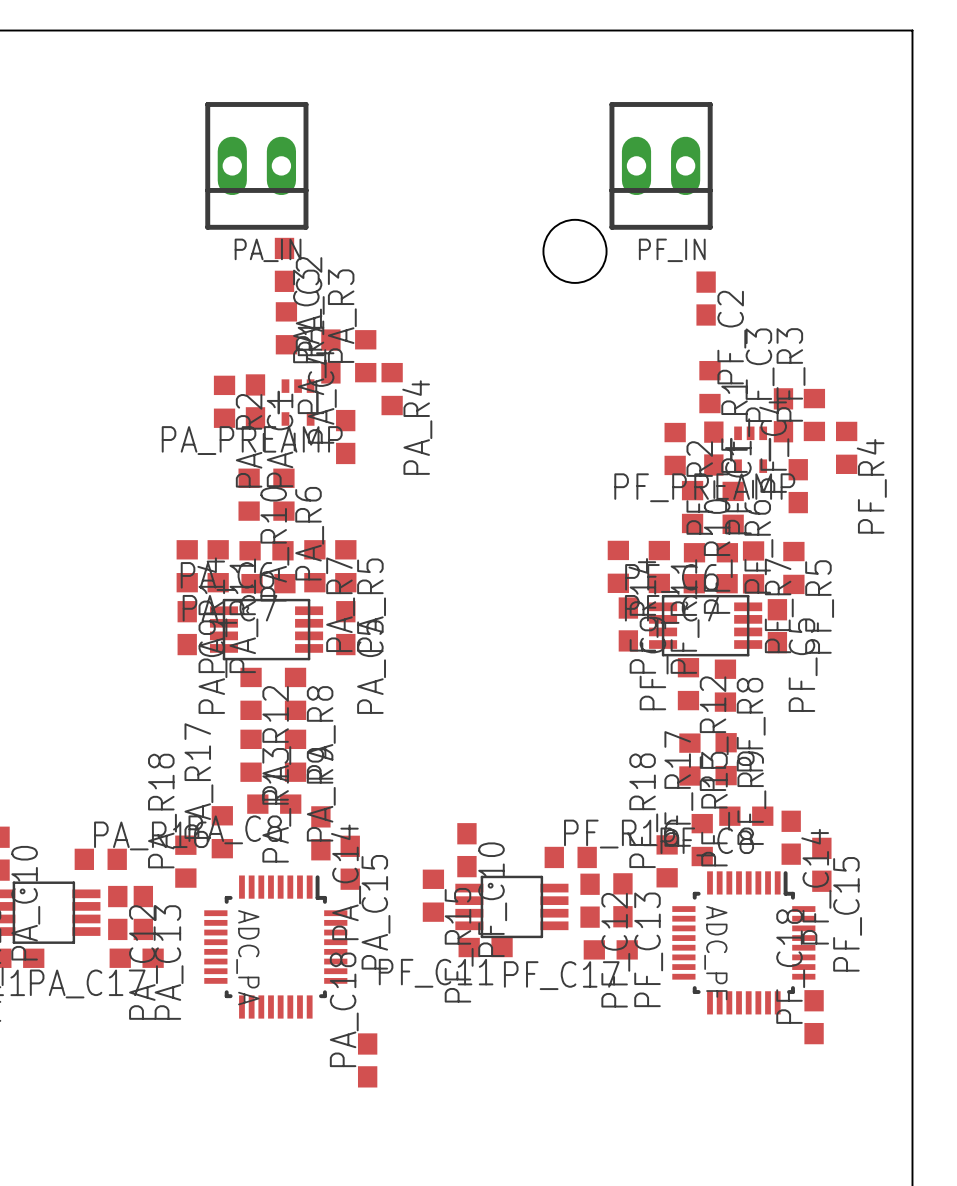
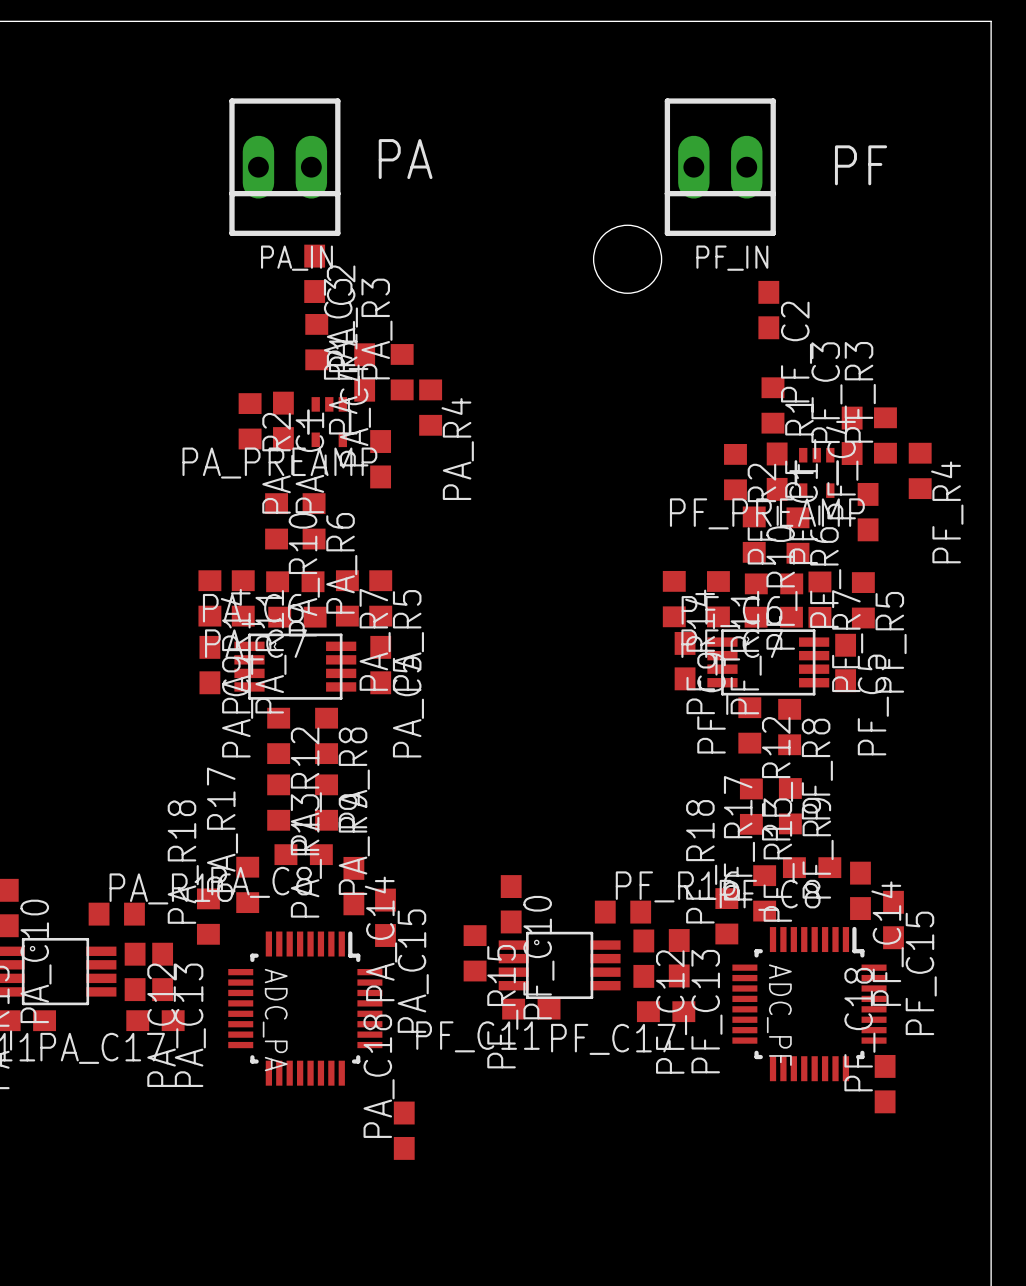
text: none -> PA (405, 159)
text: none -> PF (861, 165)

